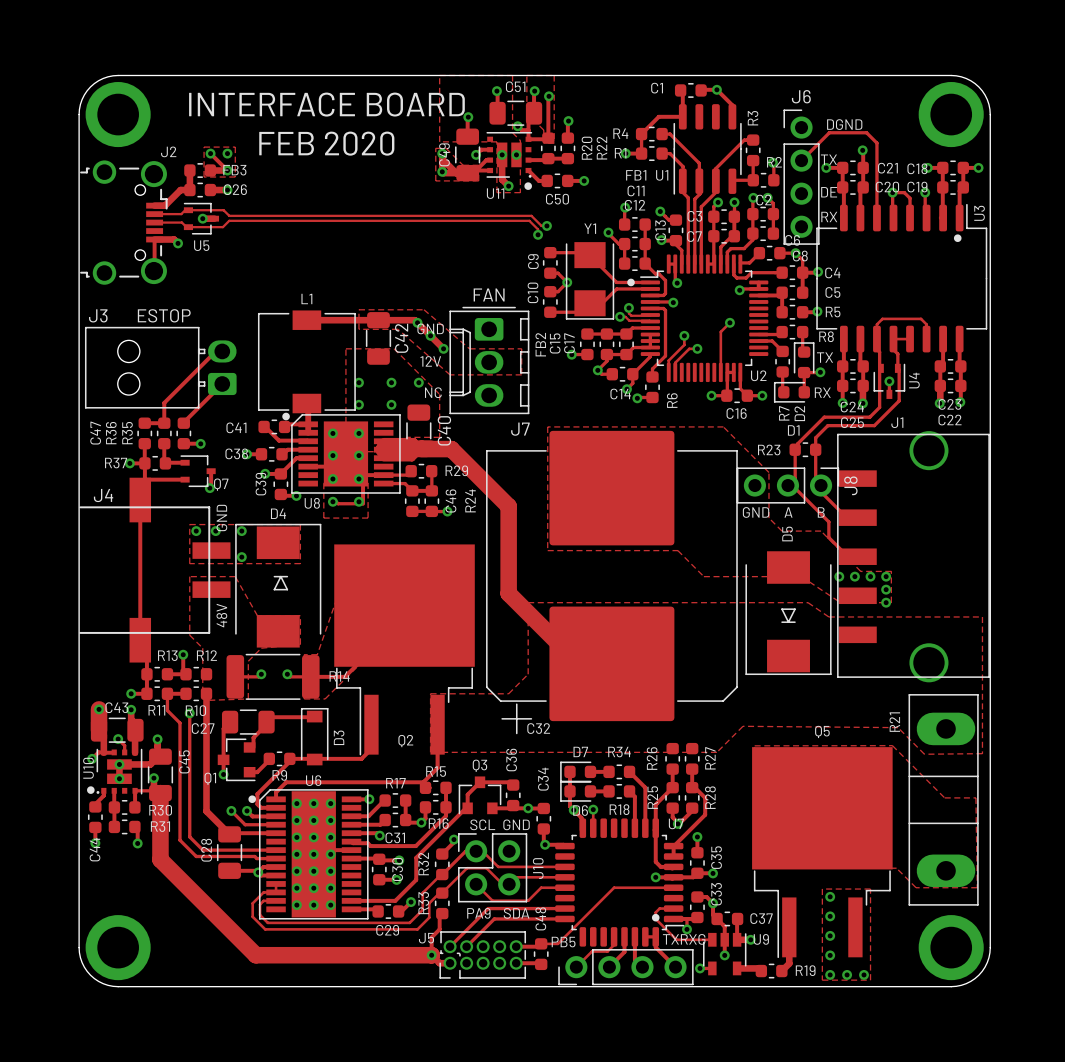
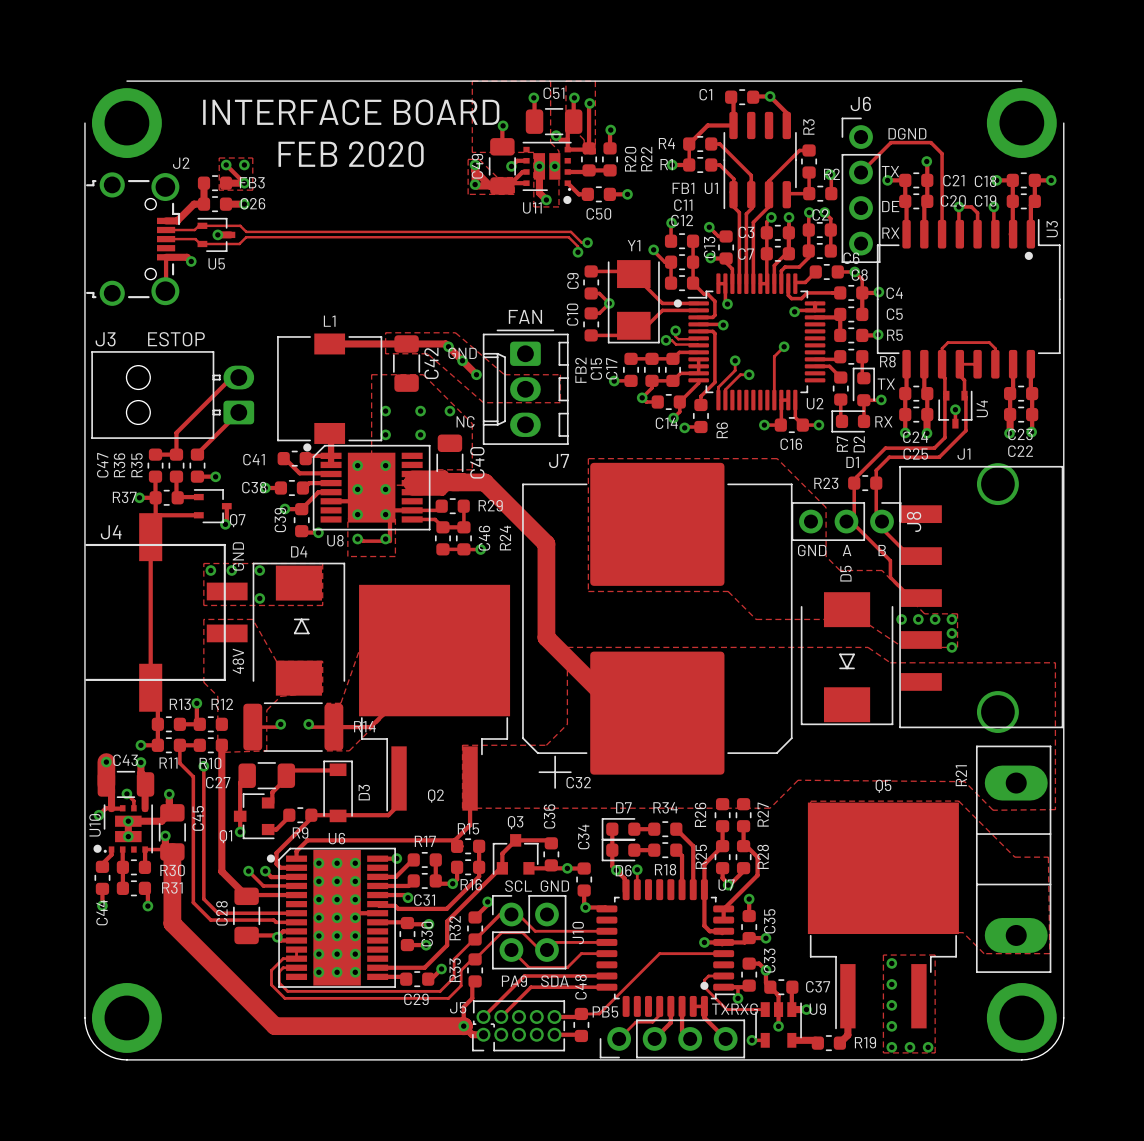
board edge: (118, 75) (103, 78) (90, 86) (82, 99) (79, 114) -> none
board edge: (951, 75) (966, 78) (978, 86) (987, 99) (990, 114) -> none
text: 12V (430, 361) -> none

